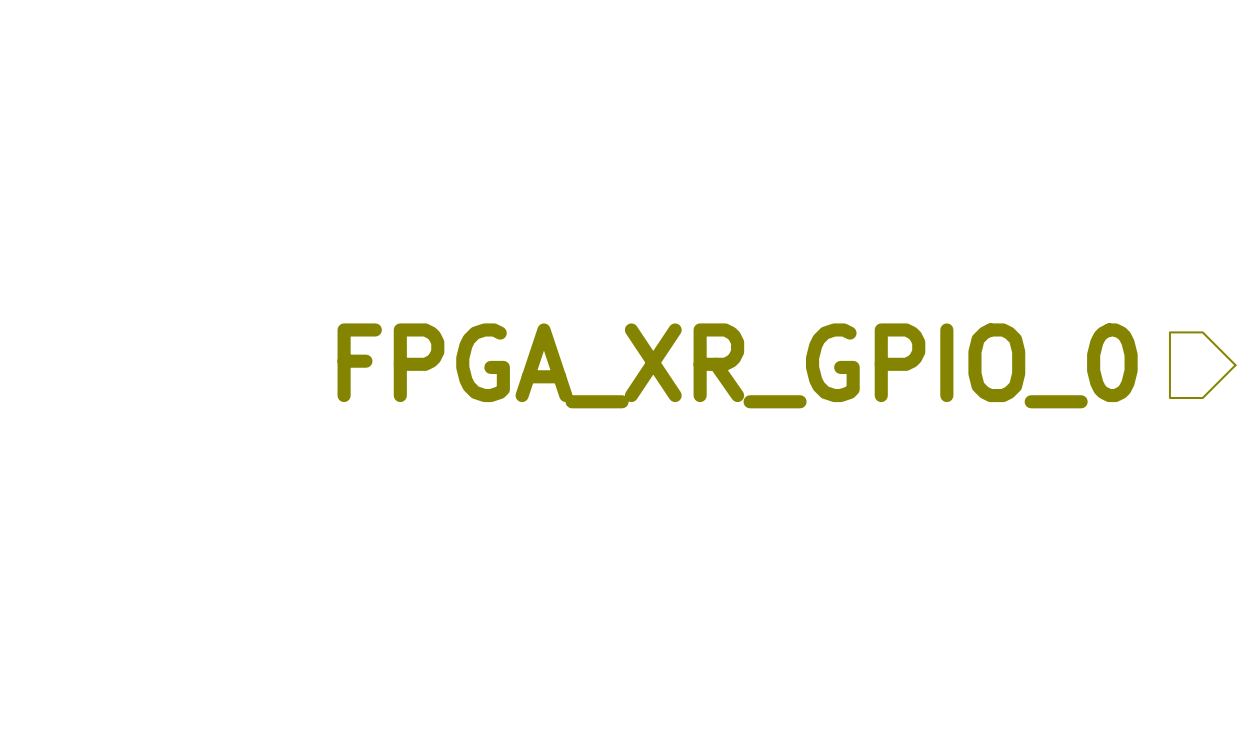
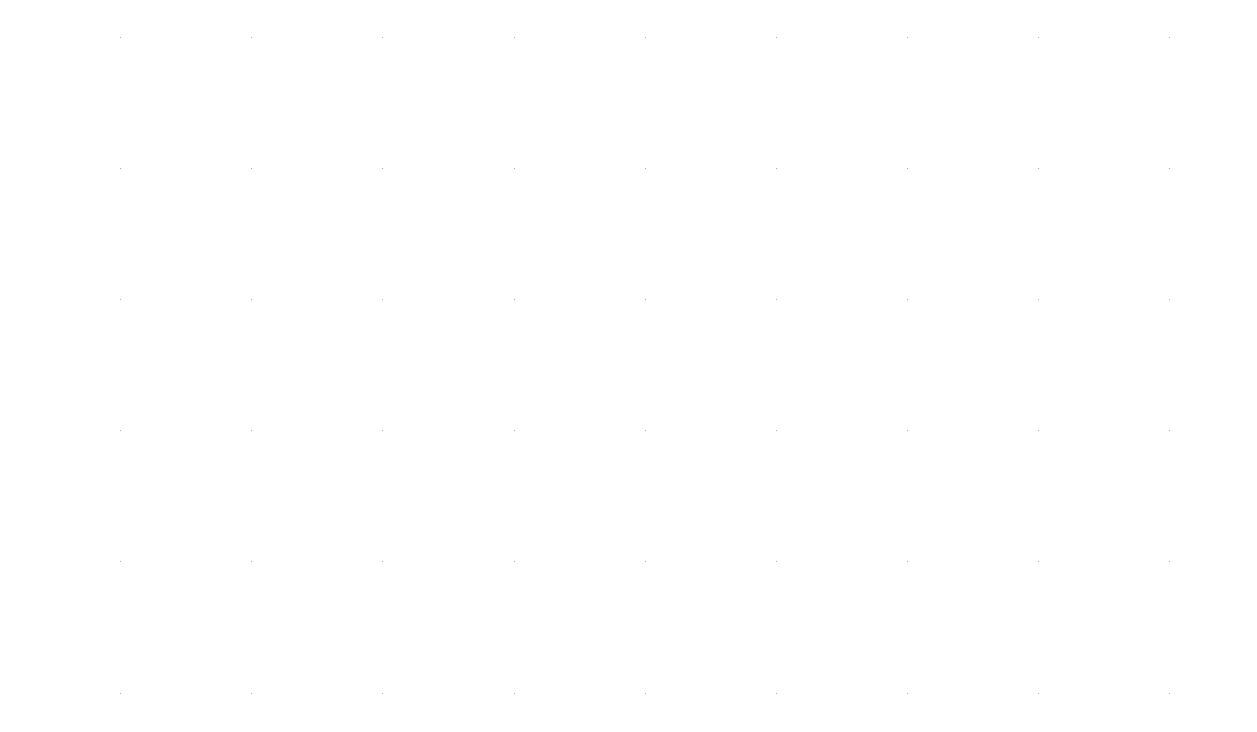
hierarchical label: FPGA_XR_GPIO_0 (737, 365) -> none

